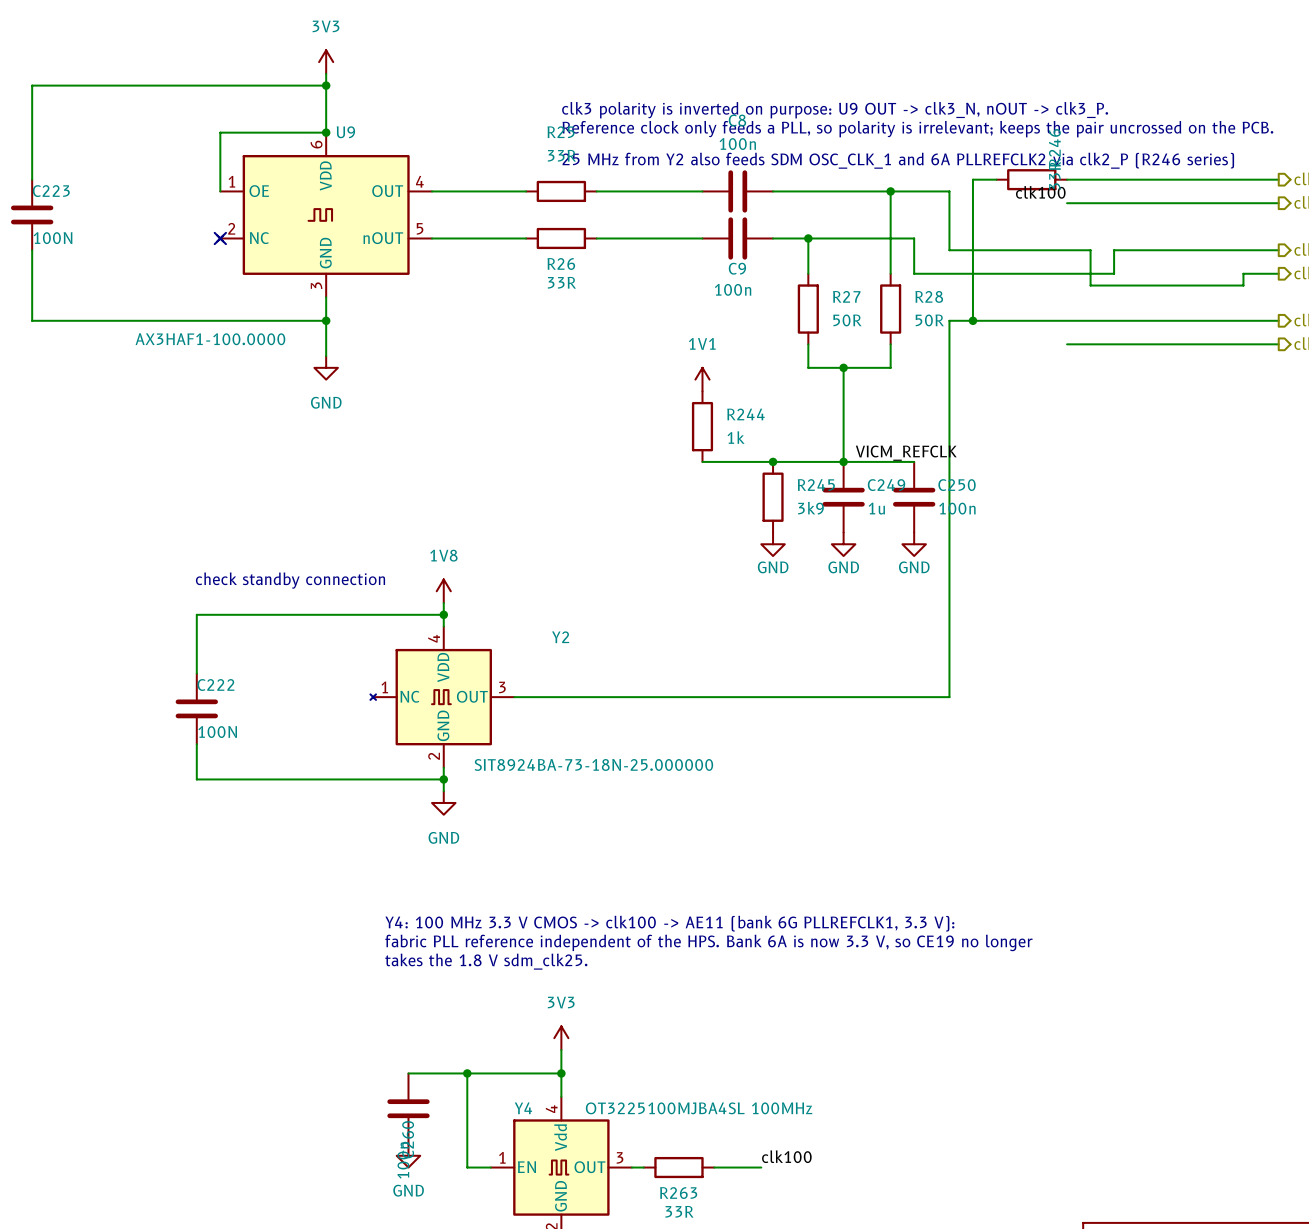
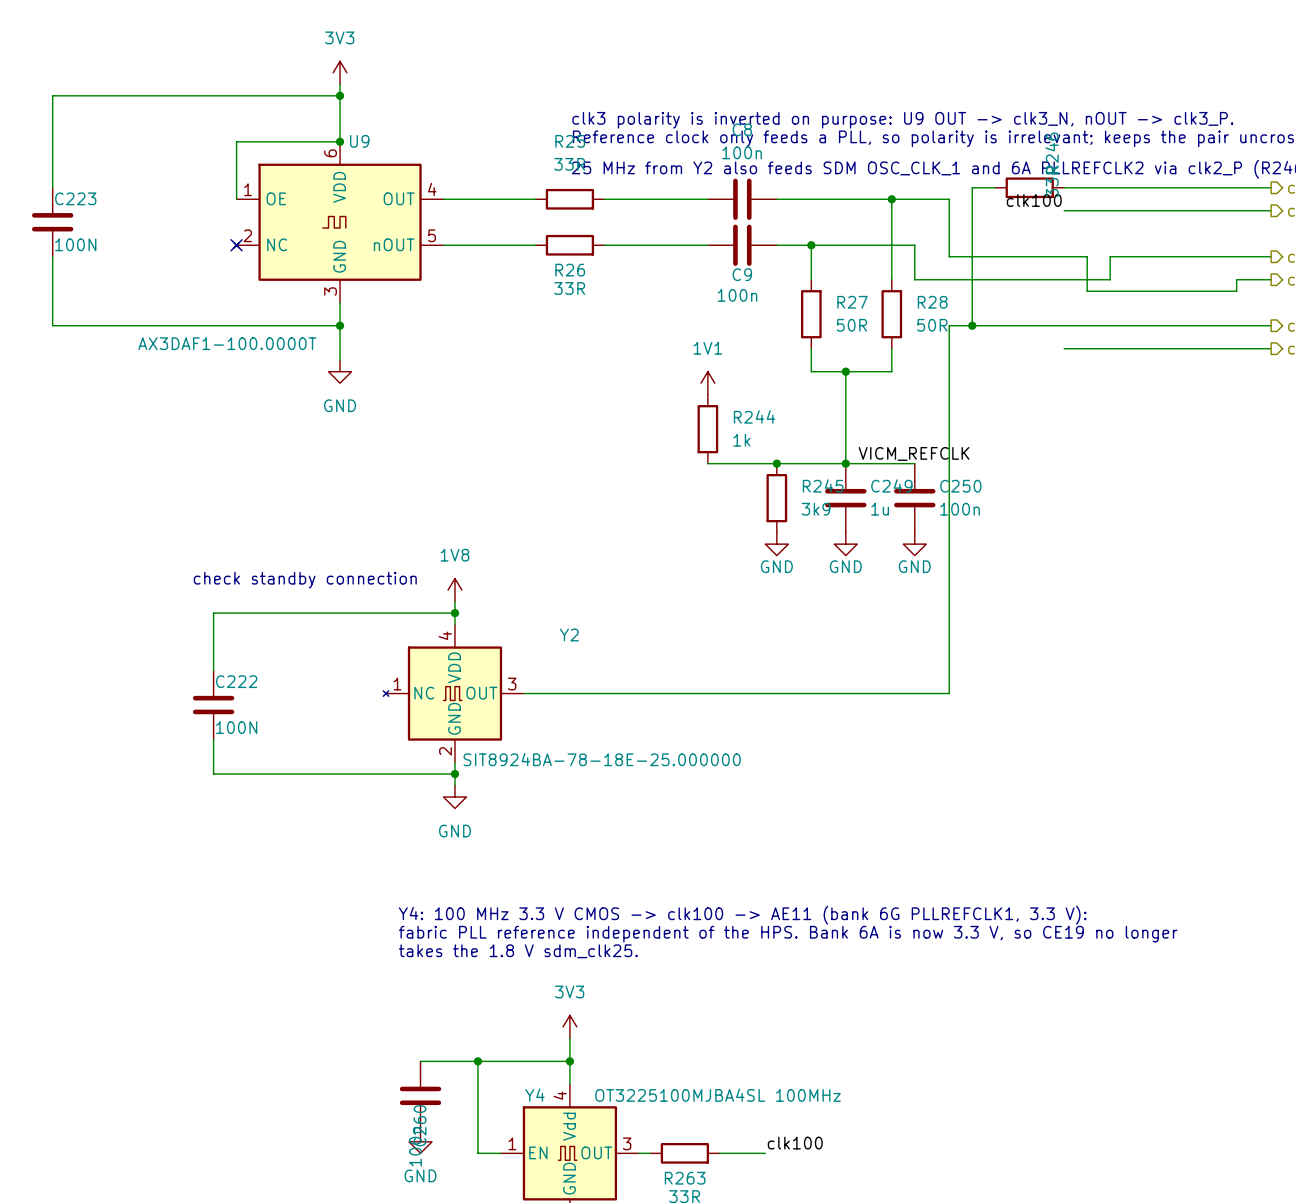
U9 value: AX3HAF1-100.0000 (210, 339) -> AX3DAF1-100.0000T (227, 343)
Y2 value: SIT8924BA-73-18N-25.000000 (593, 764) -> SIT8924BA-78-18E-25.000000 (602, 759)

